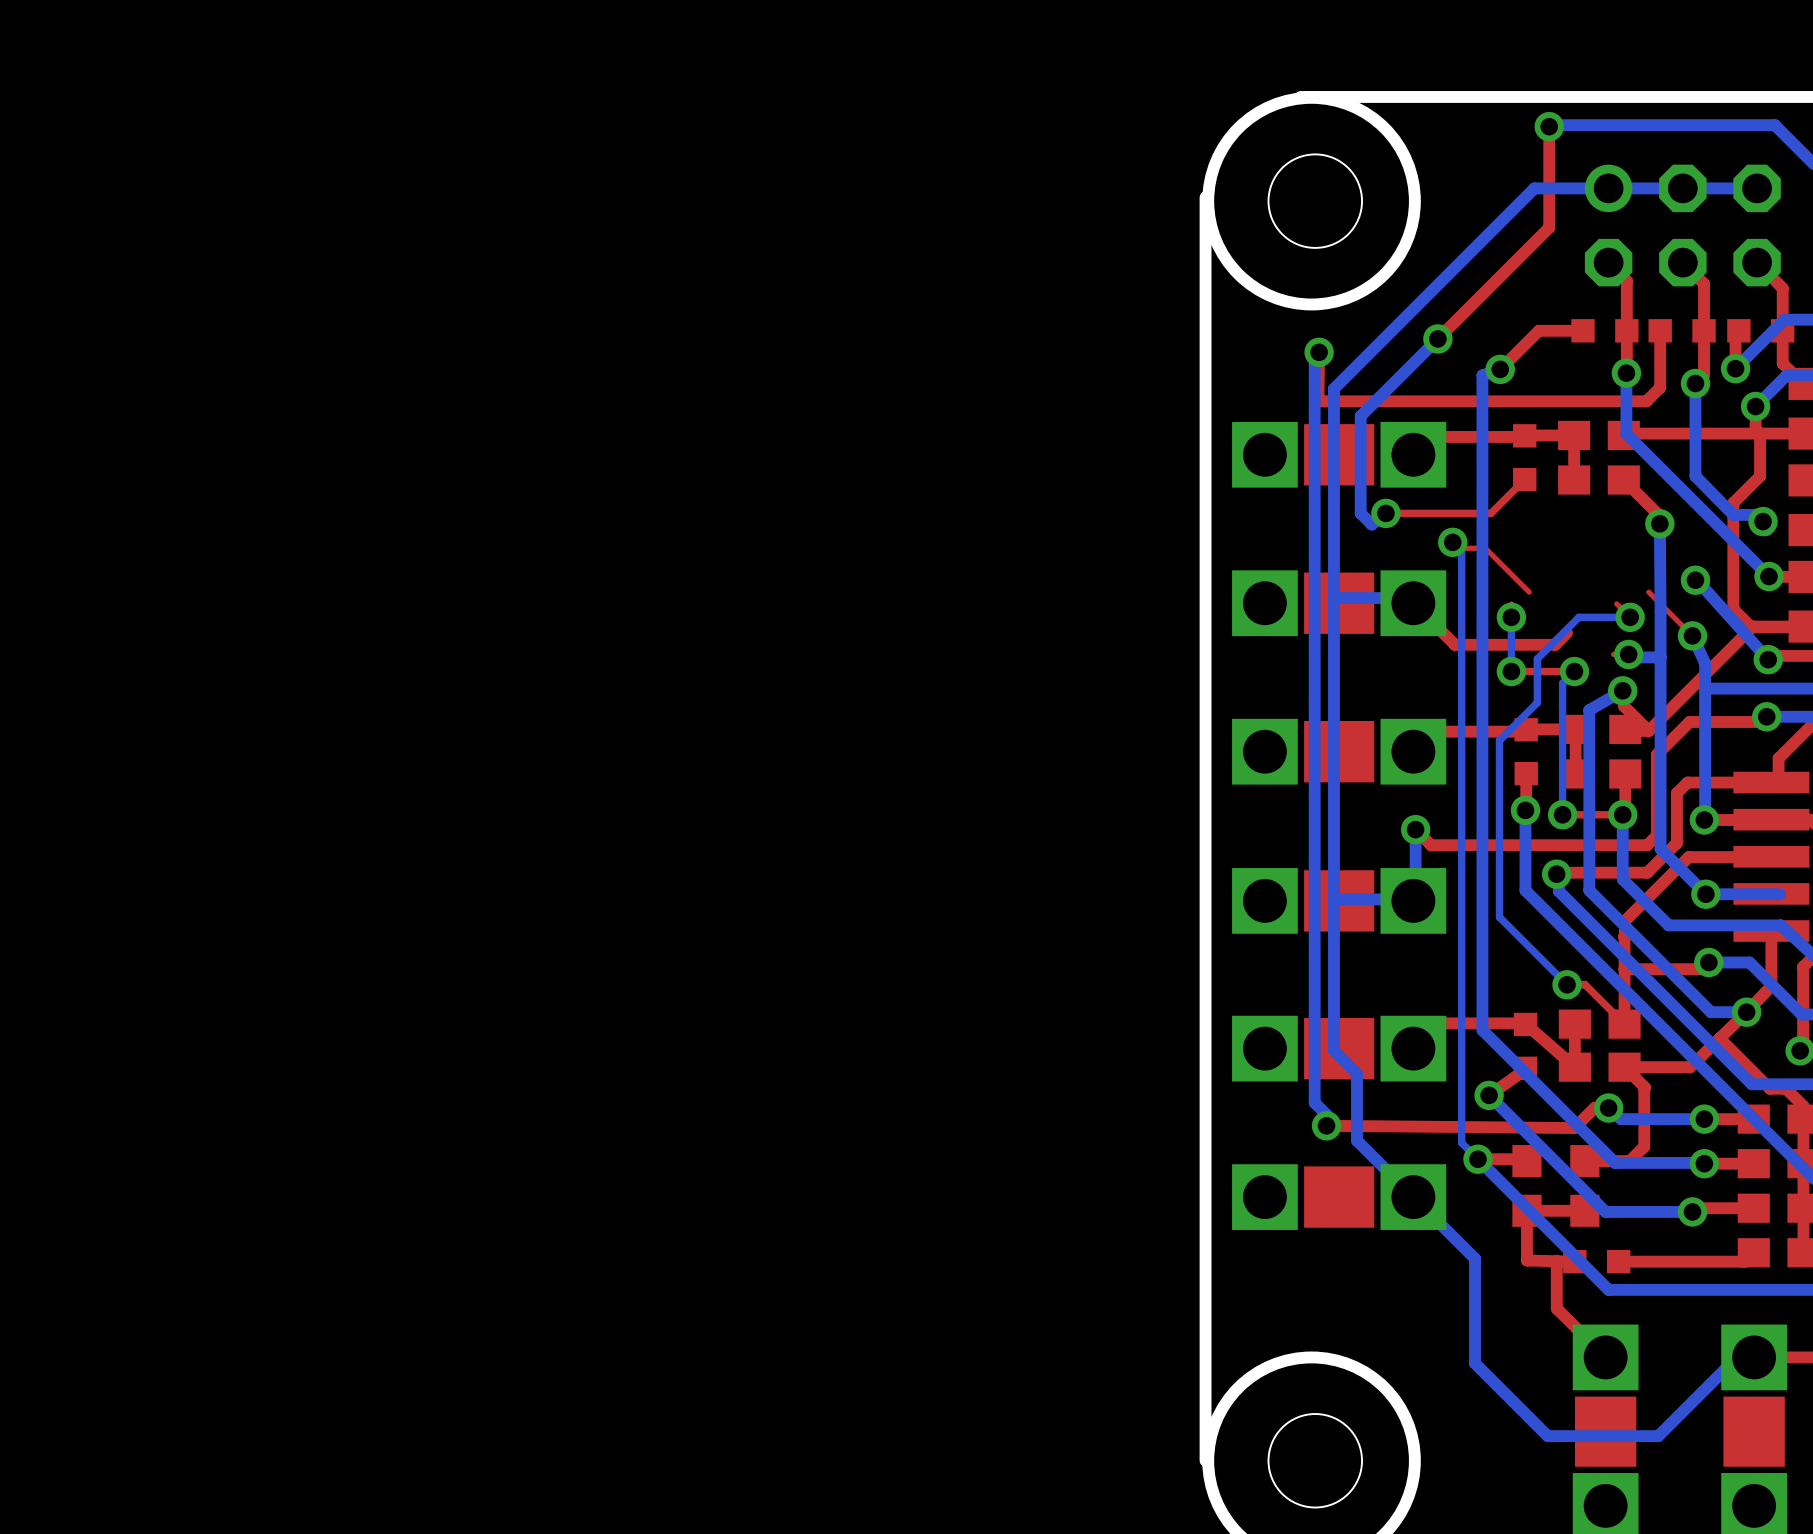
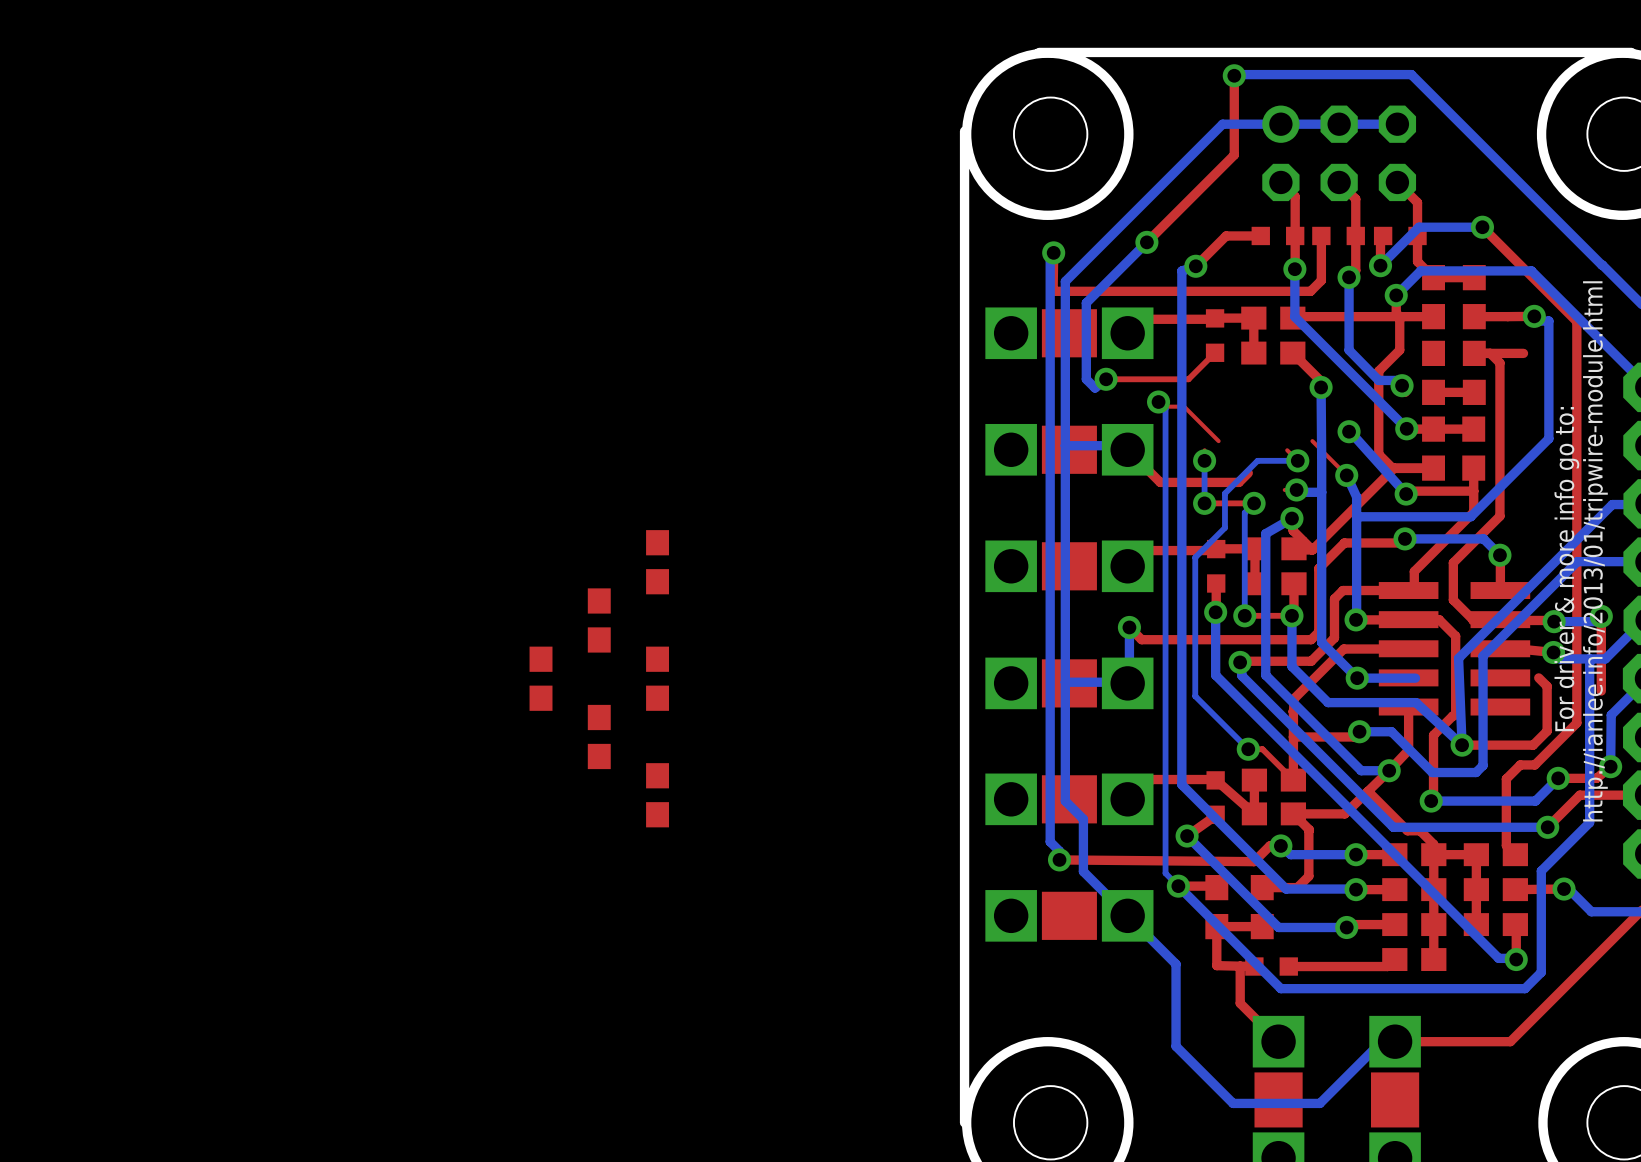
part: none -> (657, 562)
part: none -> (599, 620)
part: none -> (541, 678)
part: none -> (657, 678)
part: none -> (599, 736)
part: none -> (657, 795)

